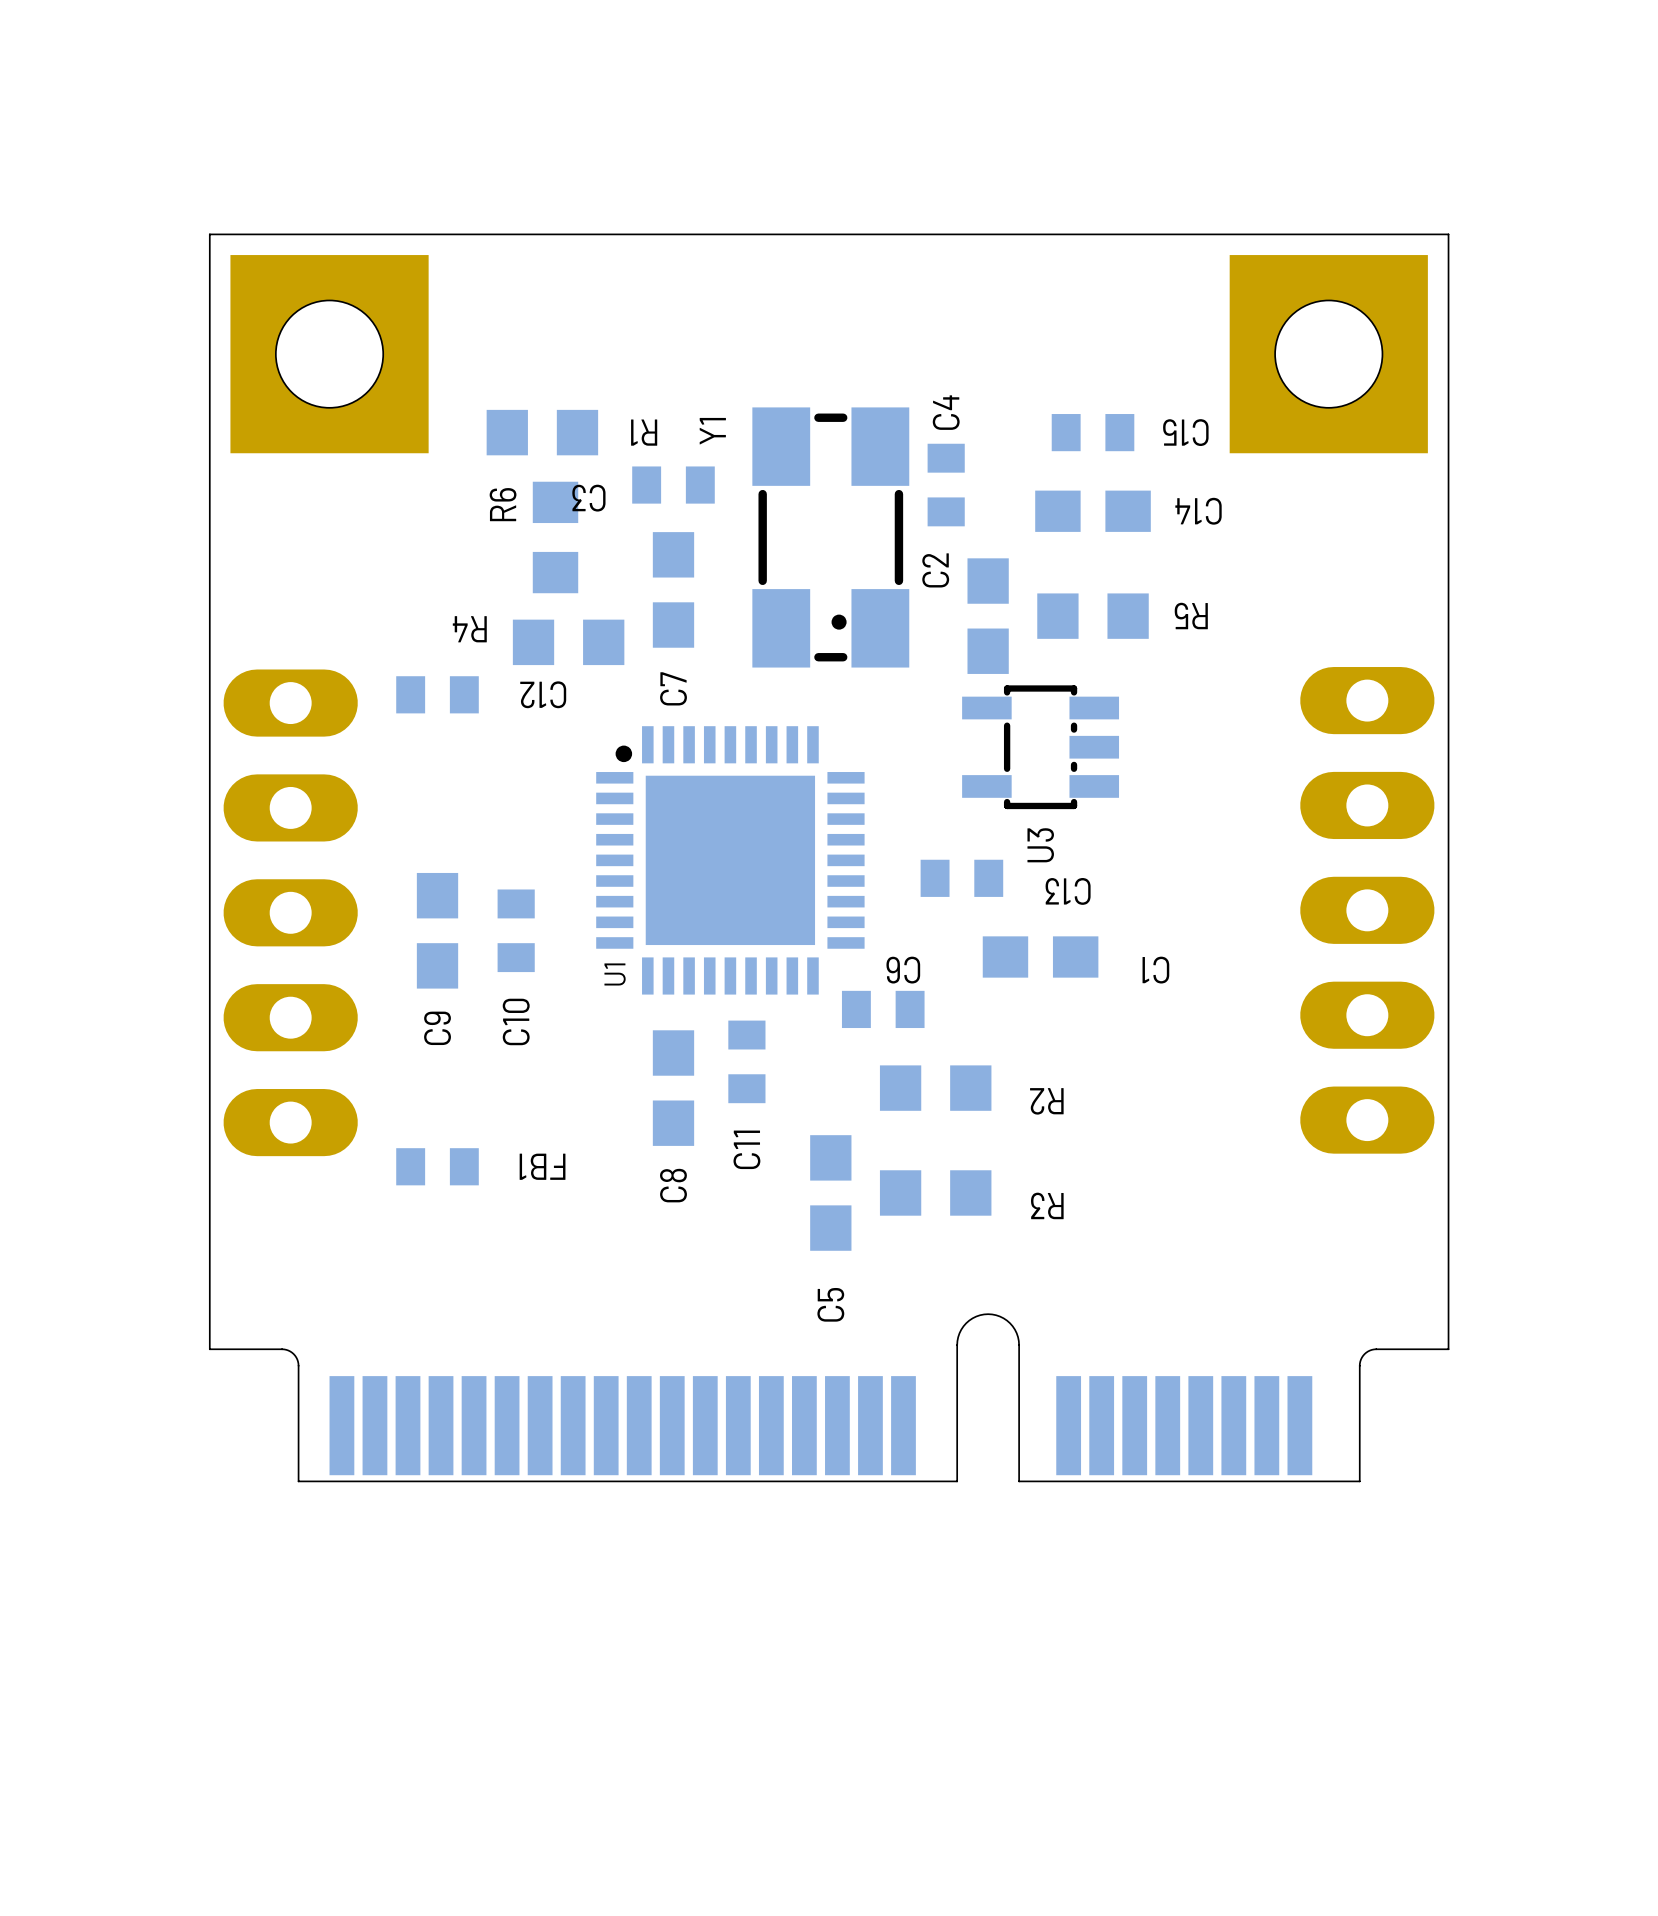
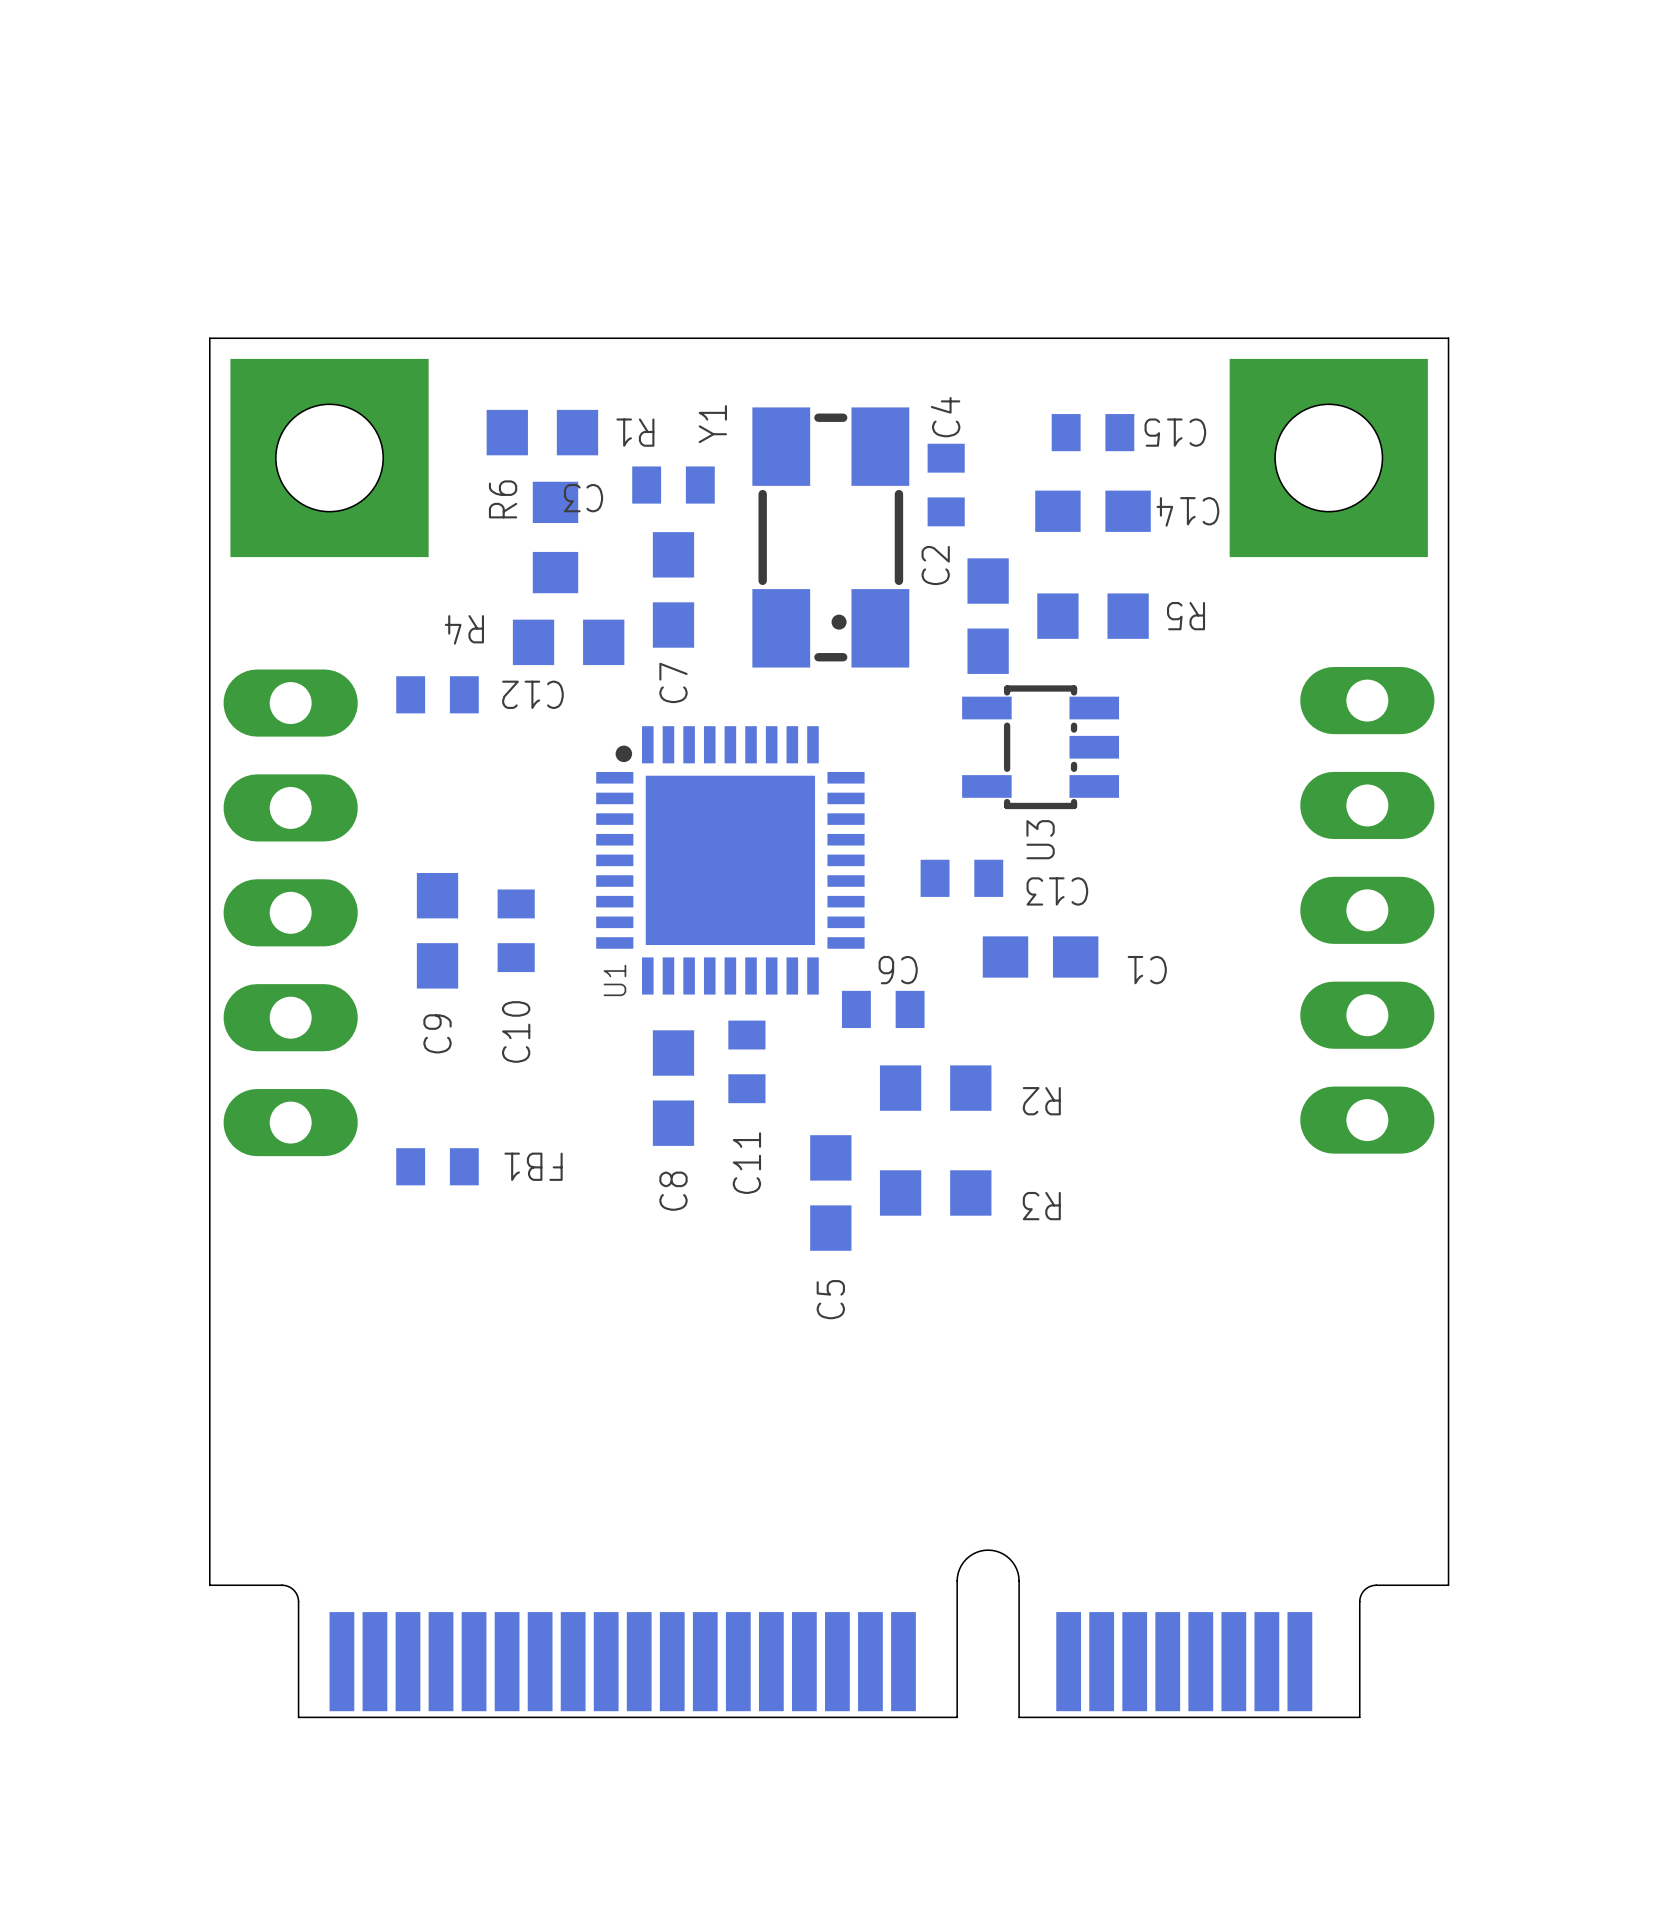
part: (829, 857) -> none
part: none -> (829, 1027)

